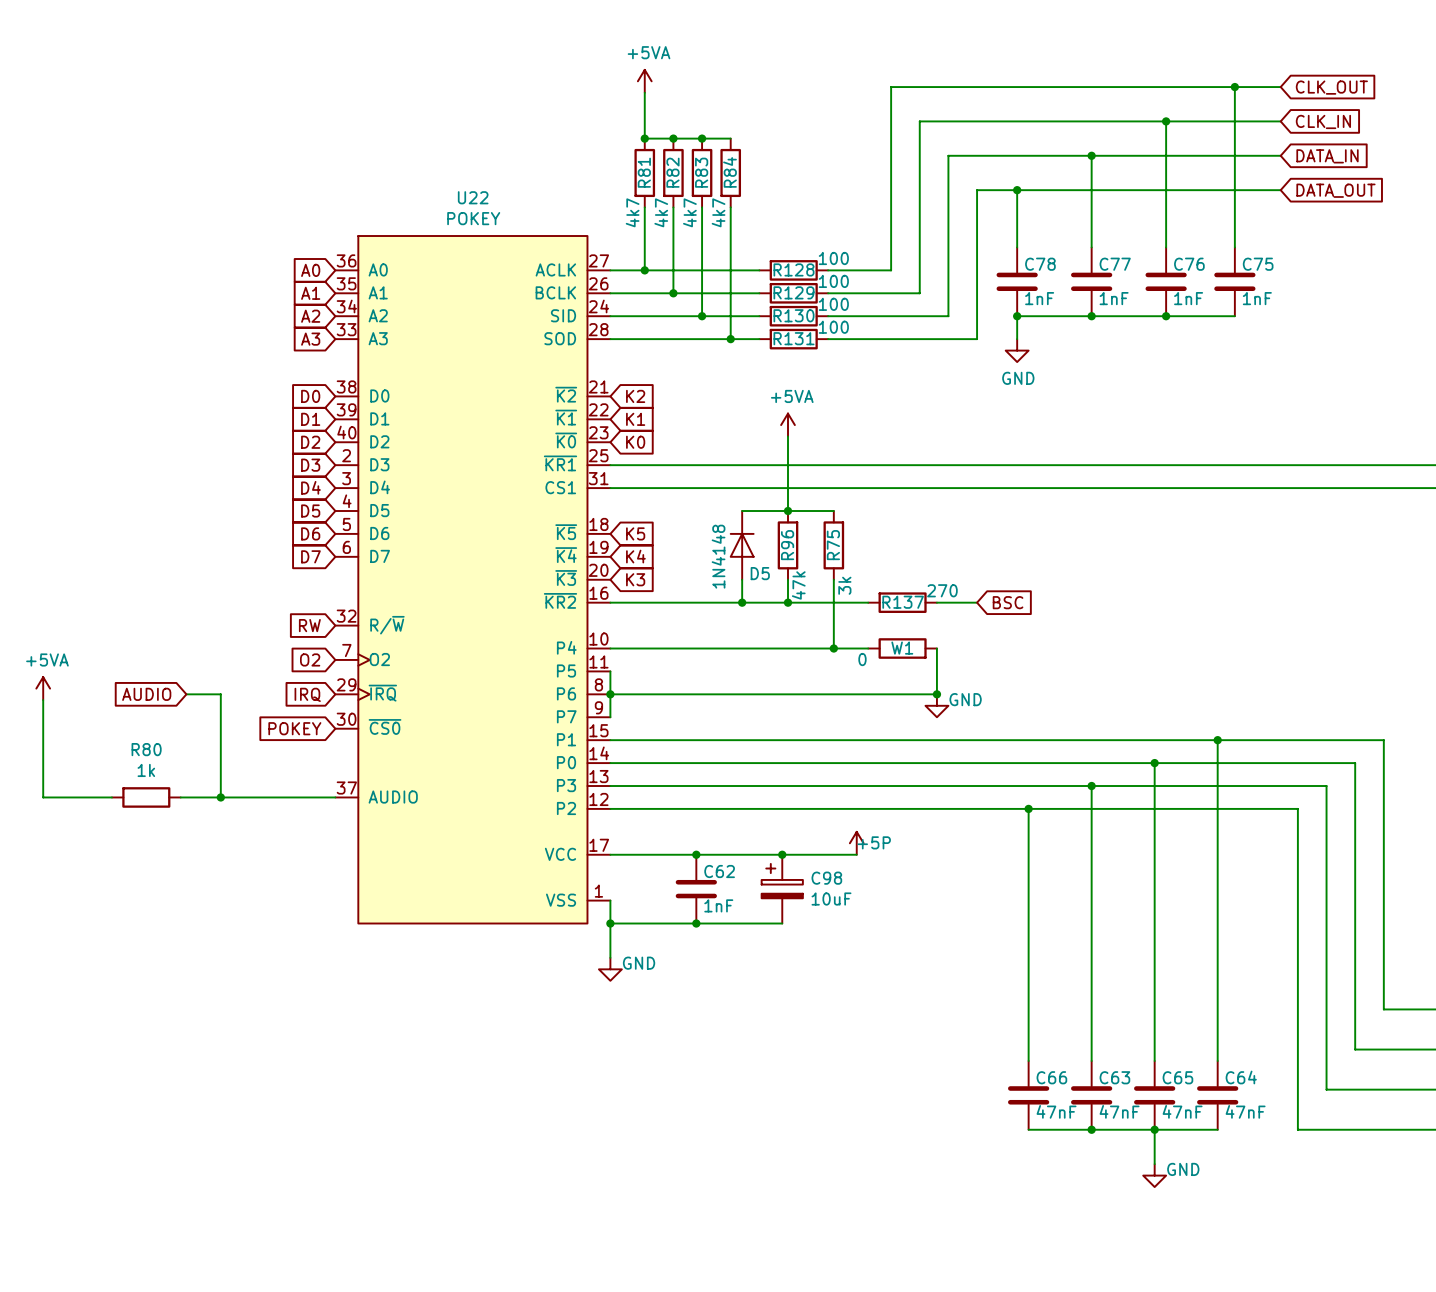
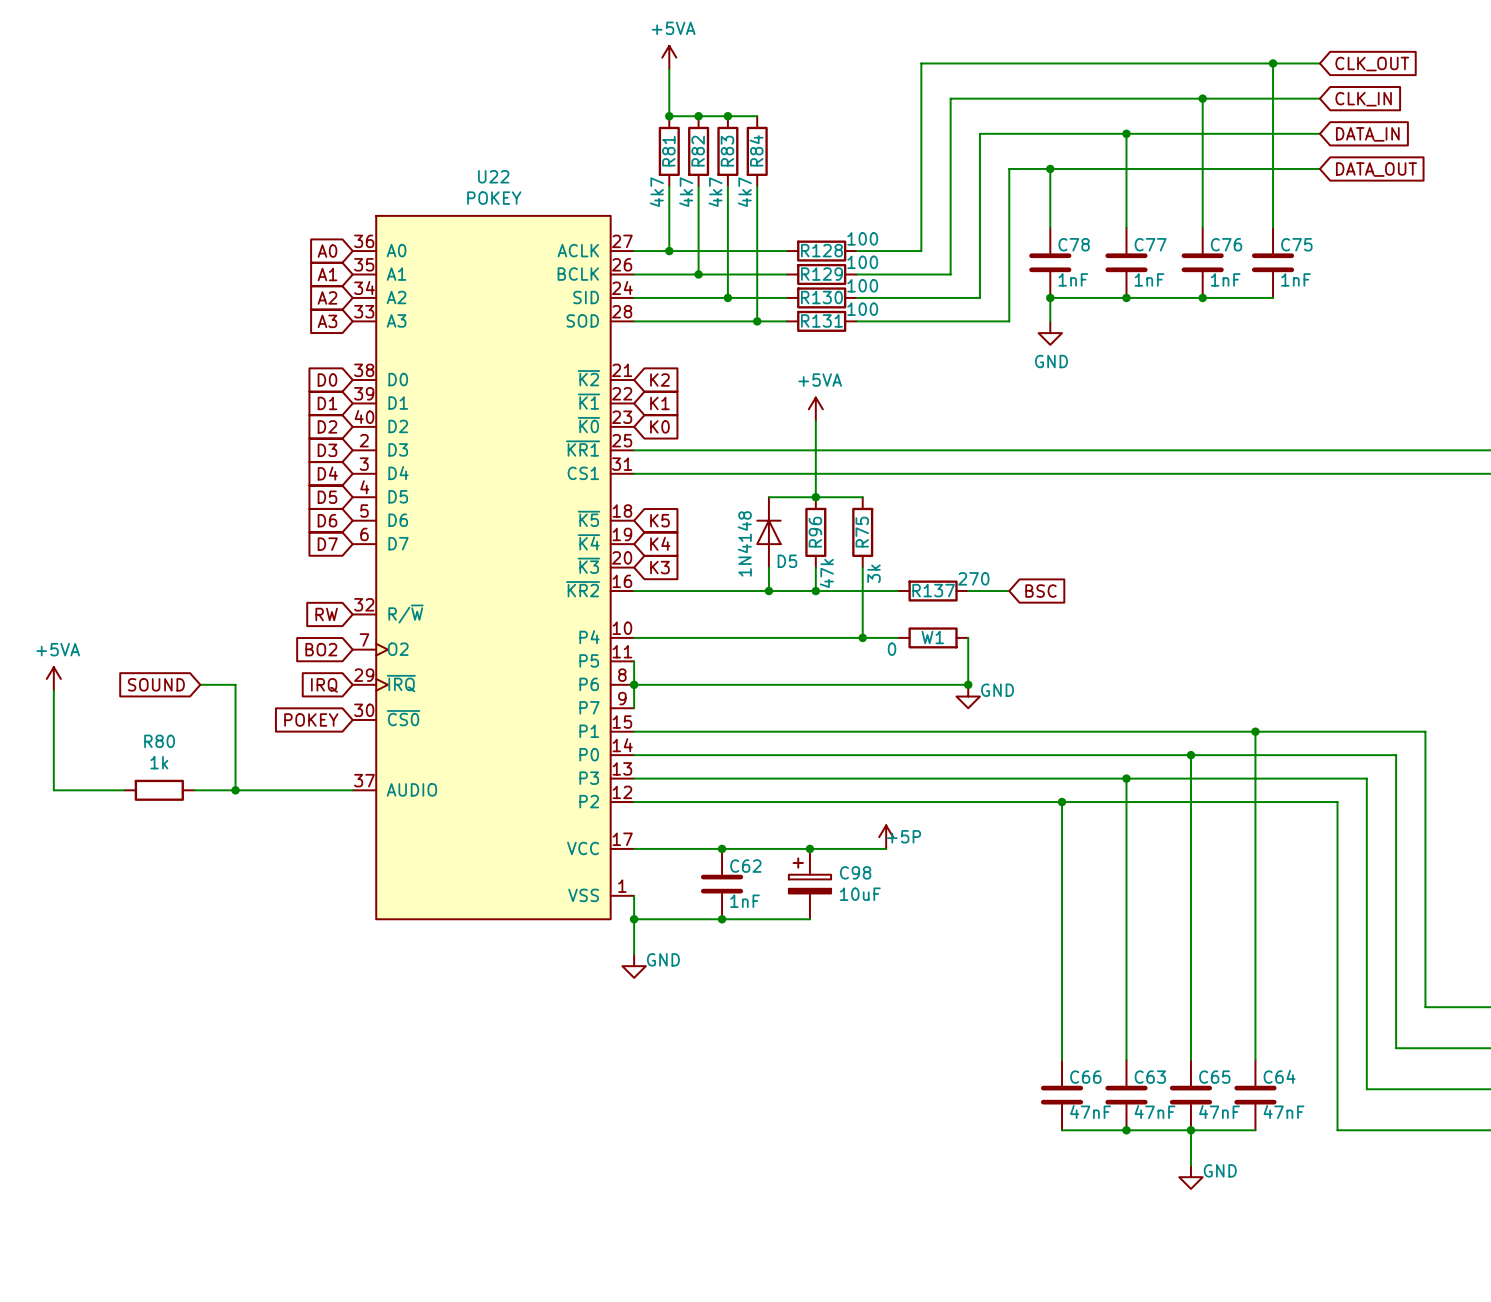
global label: O2 (310, 659) -> BO2 (321, 649)
global label: AUDIO (146, 694) -> SOUND (156, 684)

